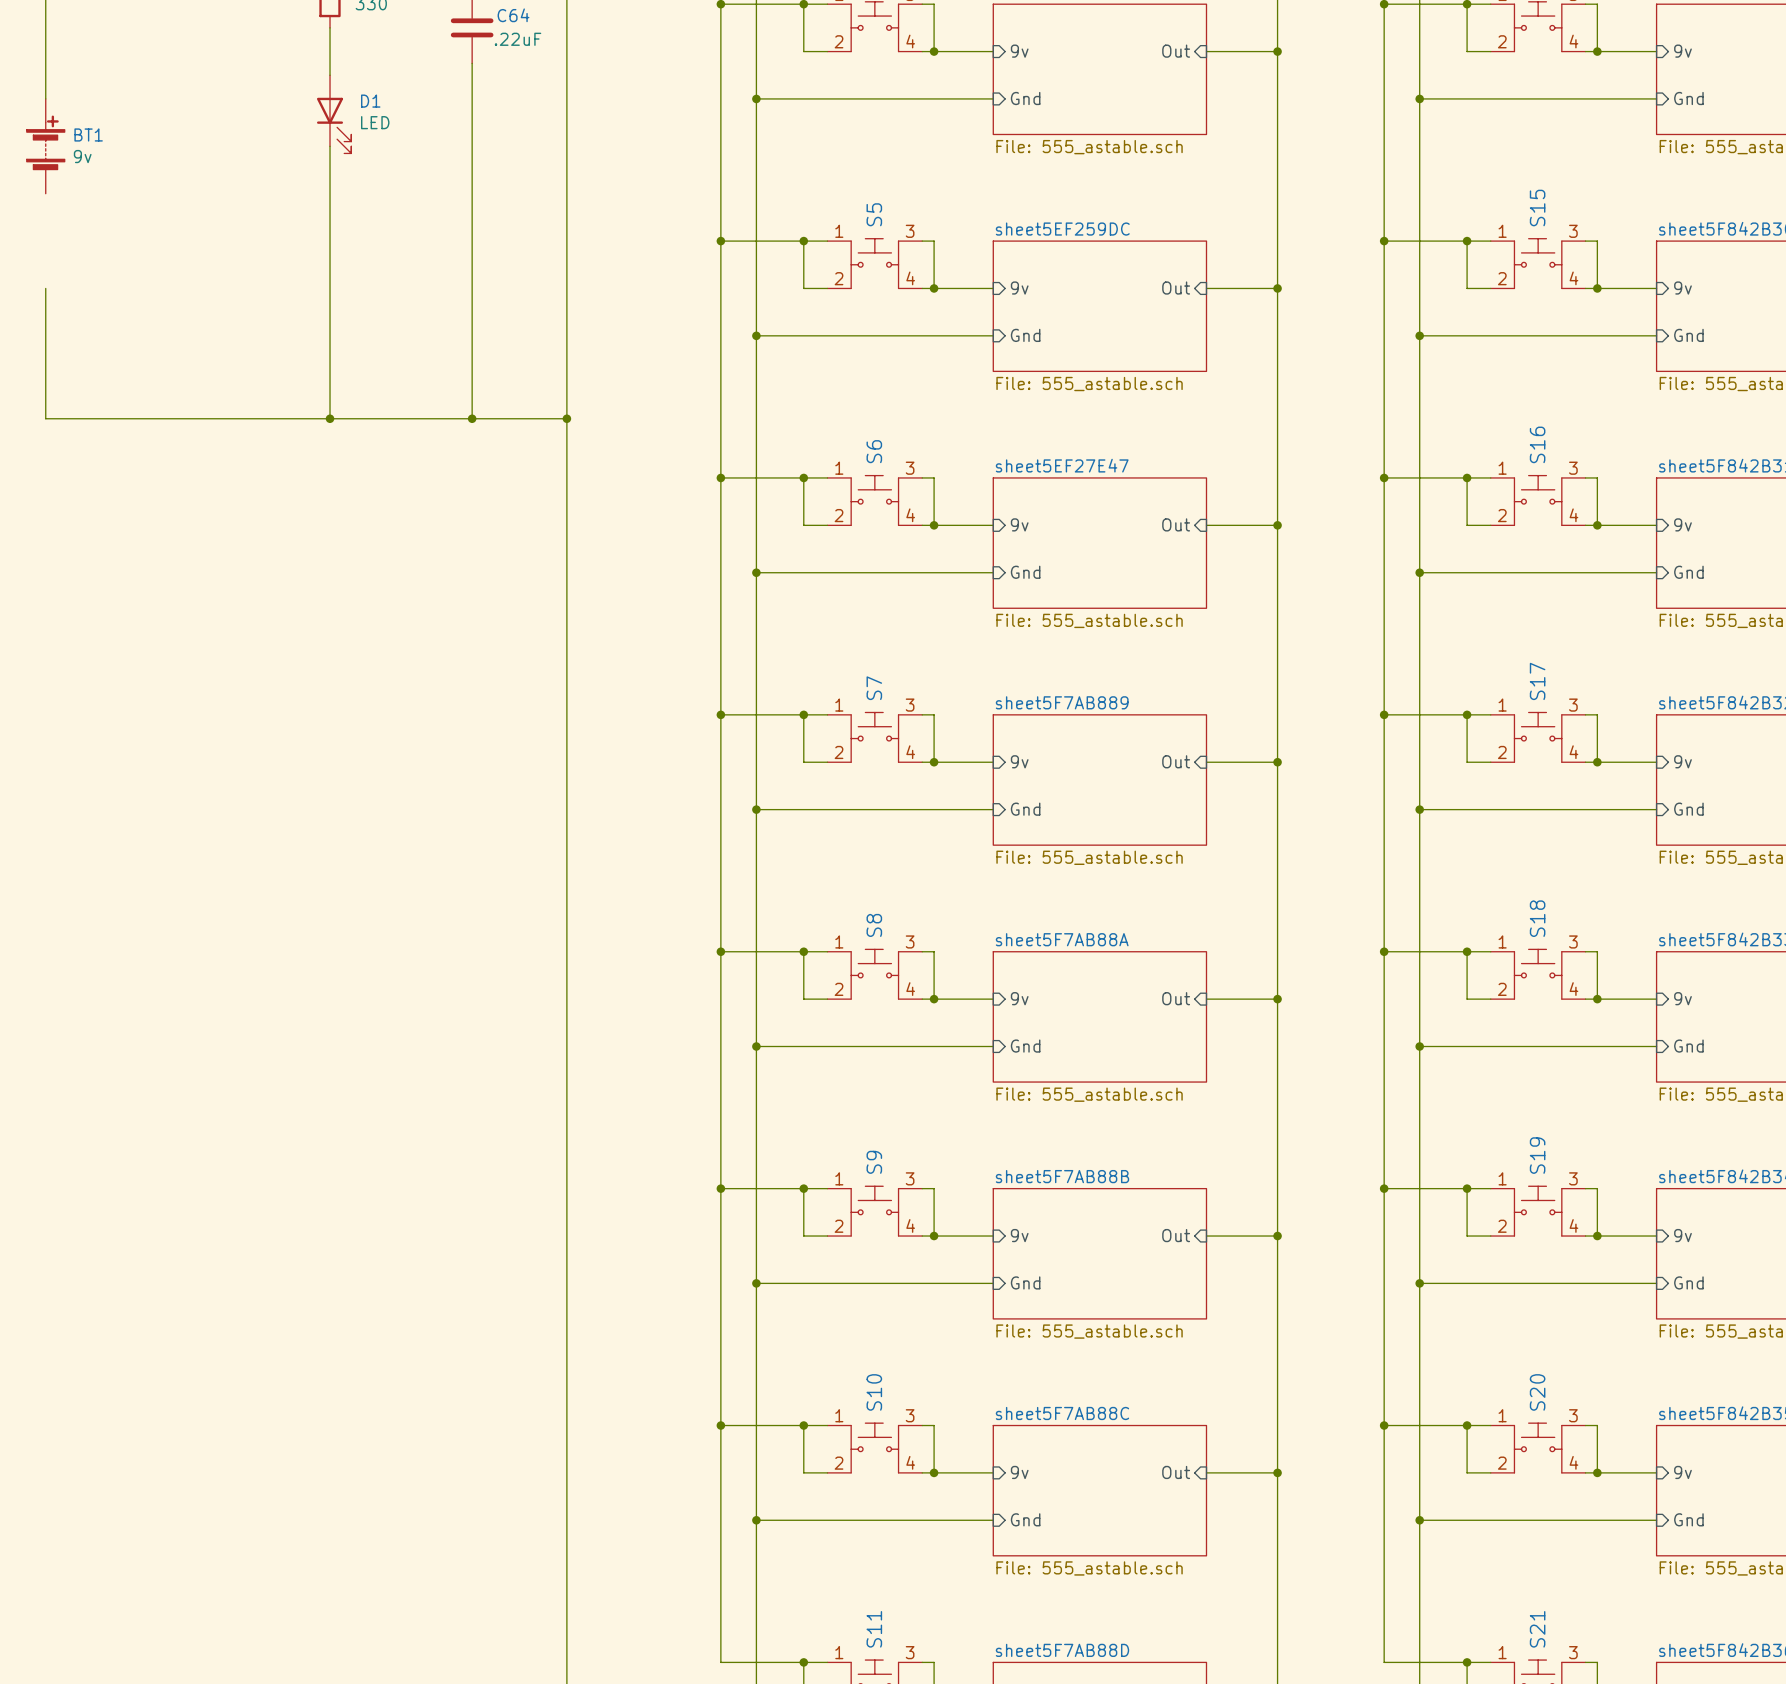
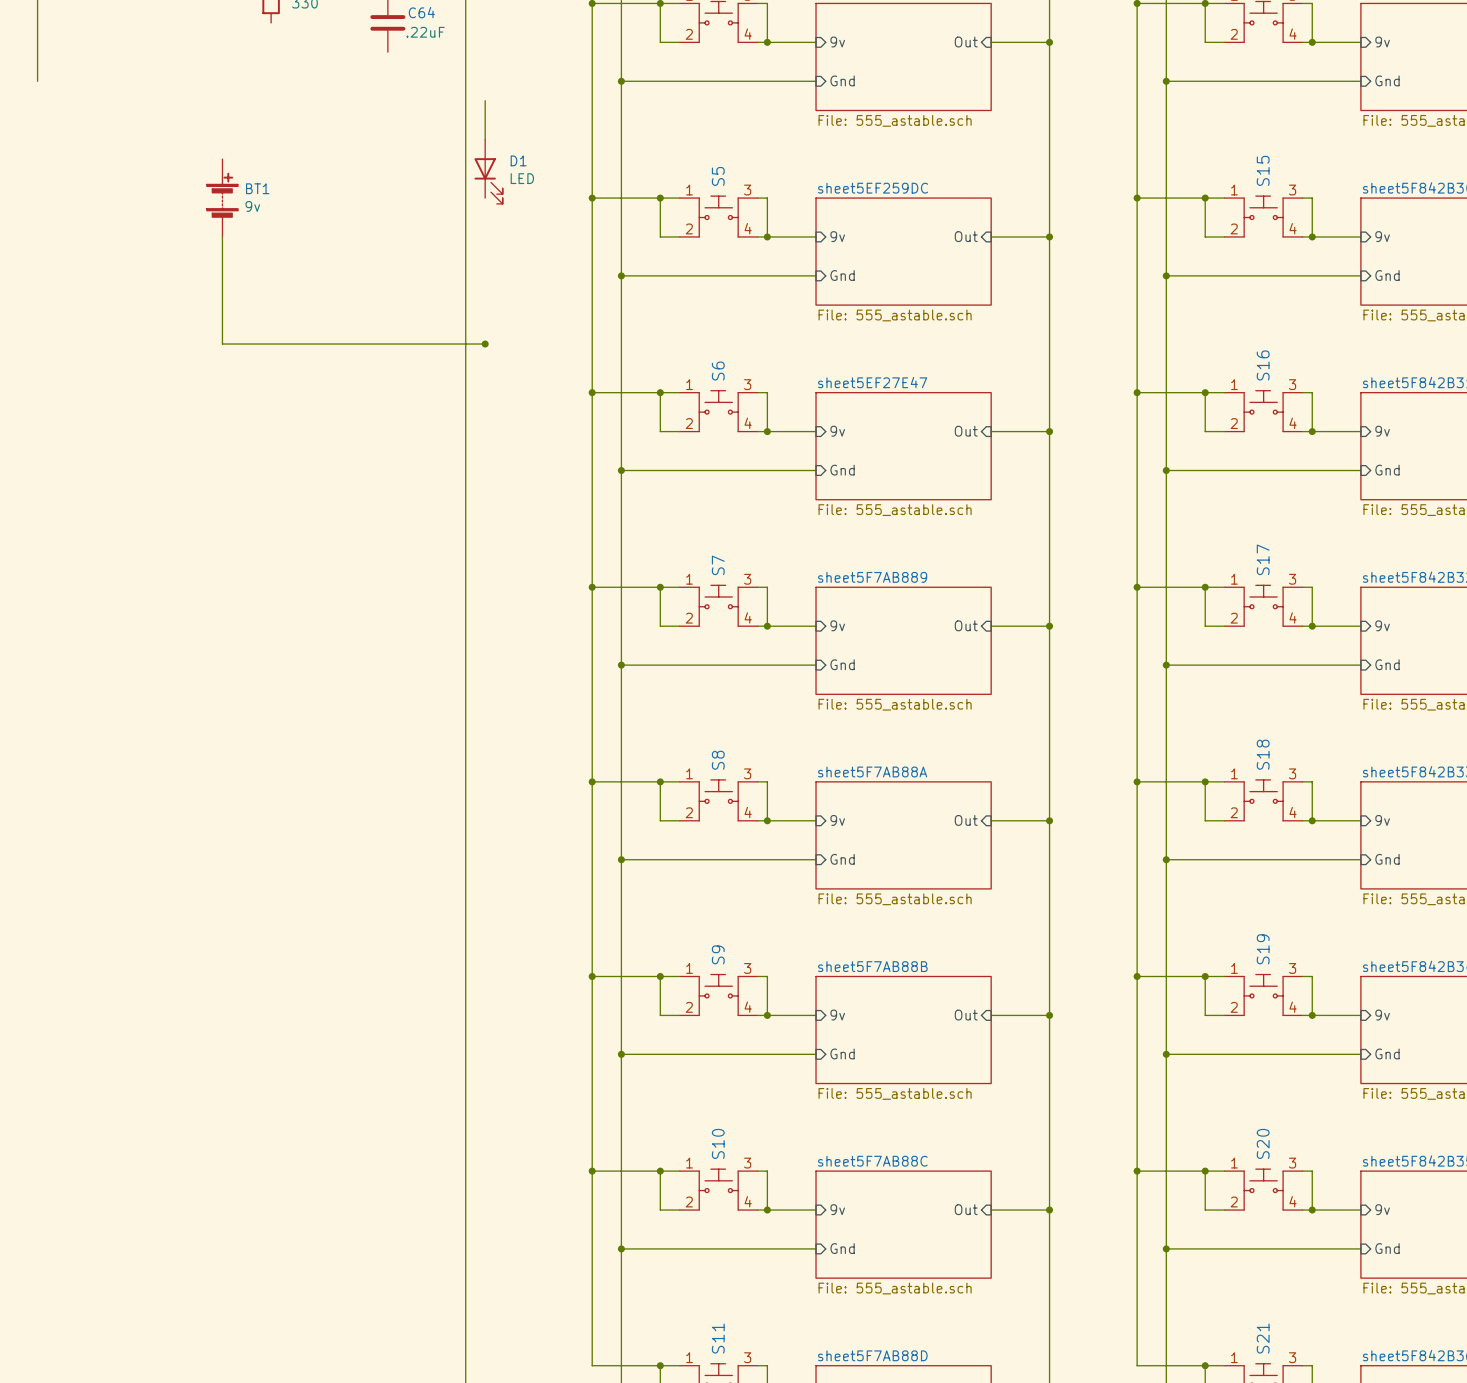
wire: (330, 27) (330, 75) -> none
wire: (472, 63) (472, 418) -> none
D1 position: (334, 114) -> (488, 171)
wire: none -> (485, 100) (485, 139)
BT1 position: (45, 146) -> (222, 198)
wire: (330, 146) (330, 418) -> none
wire: (45, 288) (45, 418) (270, 418) -> (222, 236) (222, 344)
junction: (330, 418) -> none
junction: (472, 418) -> none
wire: none -> (465, 344) (485, 344)
junction position: (566, 418) -> (485, 344)

